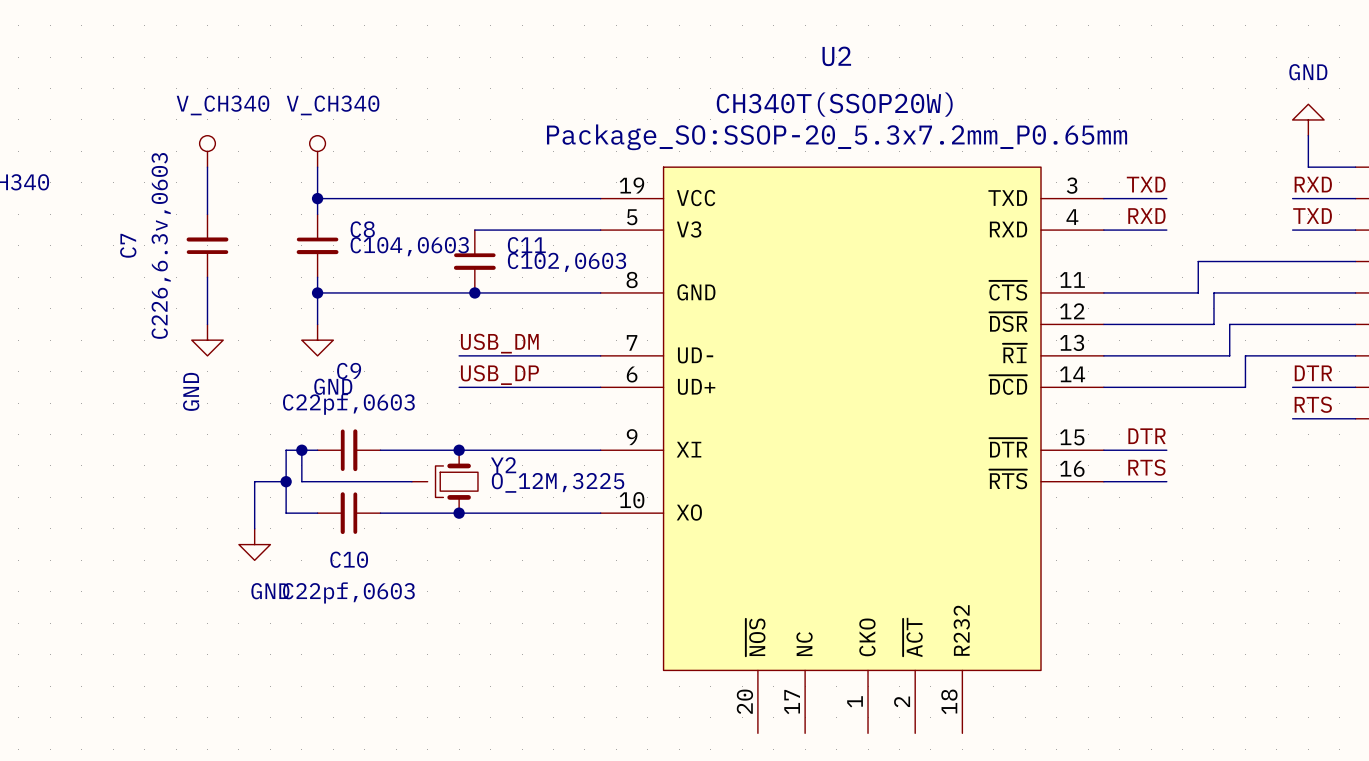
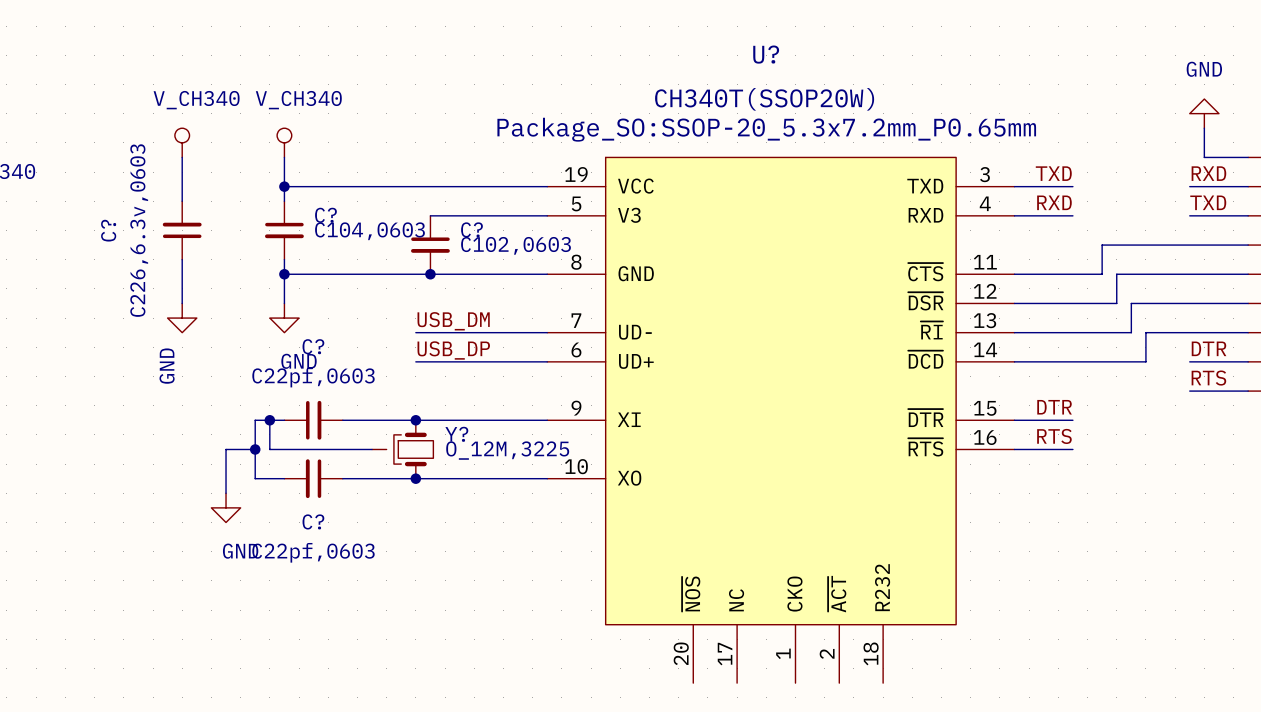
U2 name: U2 (836, 56) -> U? (766, 54)
C8 name: C8 (362, 229) -> C? (325, 215)
C7 name: C7 (128, 245) -> C? (108, 230)
C11 name: C11 (526, 245) -> C? (471, 229)
C9 name: C9 (349, 371) -> C? (313, 346)
Y2 name: Y2 (503, 465) -> Y? (456, 434)
C10 name: C10 (349, 559) -> C? (313, 521)

